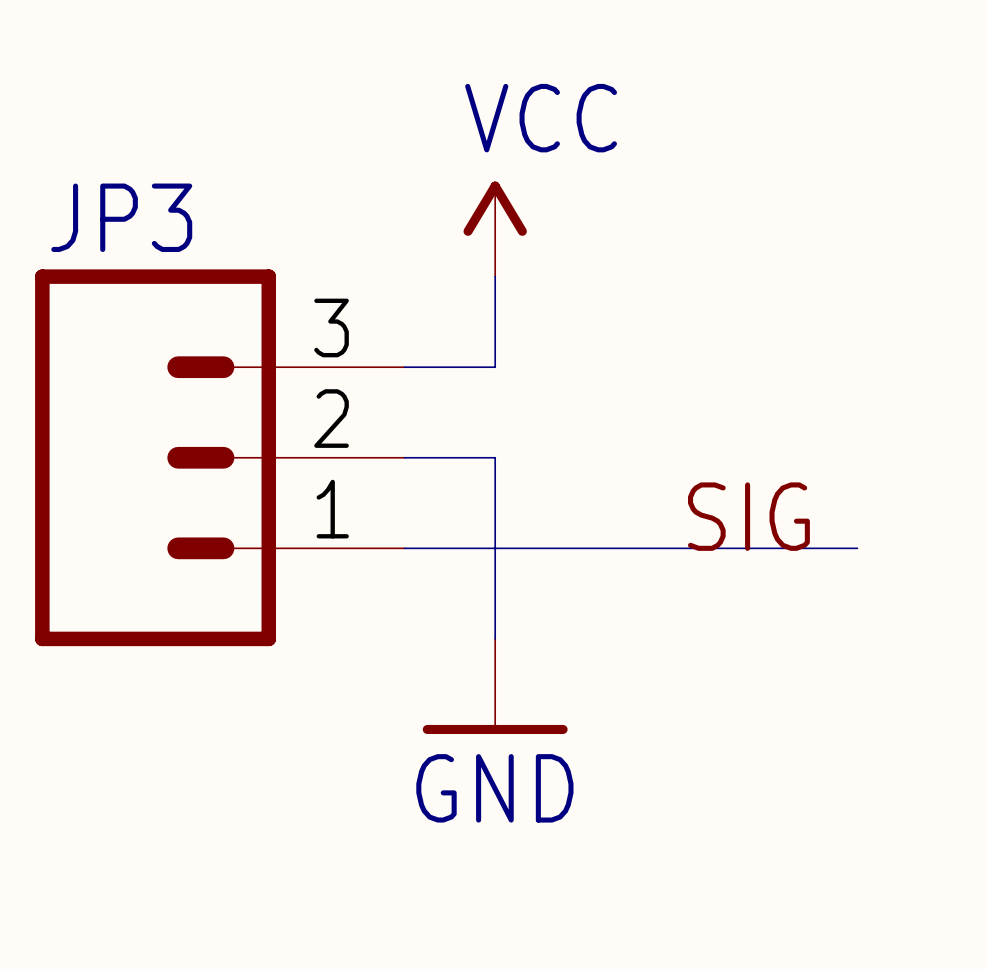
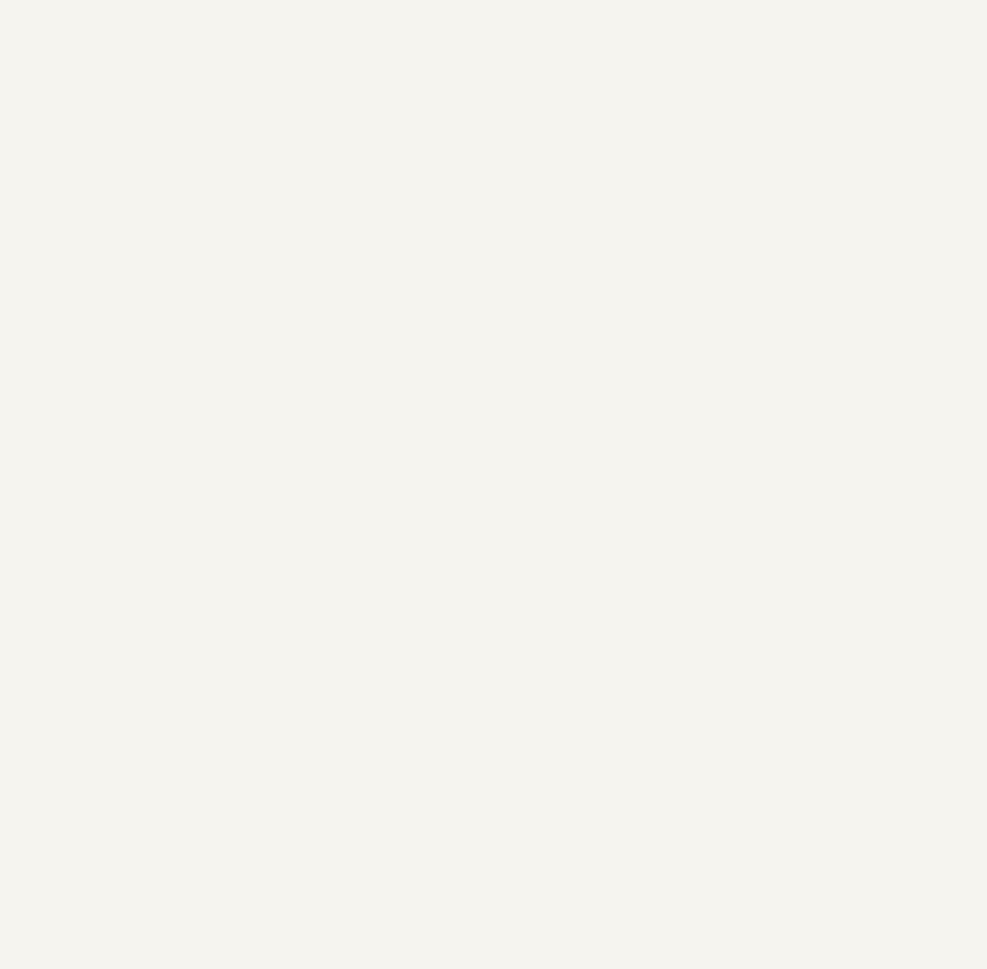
power symbol: VCC (495, 229) -> none
wire: (495, 276) (495, 367) (404, 367) -> none
JP3: (219, 457) -> none
wire: (404, 457) (495, 457) (495, 638) -> none
label: SIG (748, 516) -> none
wire: (404, 548) (857, 548) -> none
power symbol: GND (495, 686) -> none

